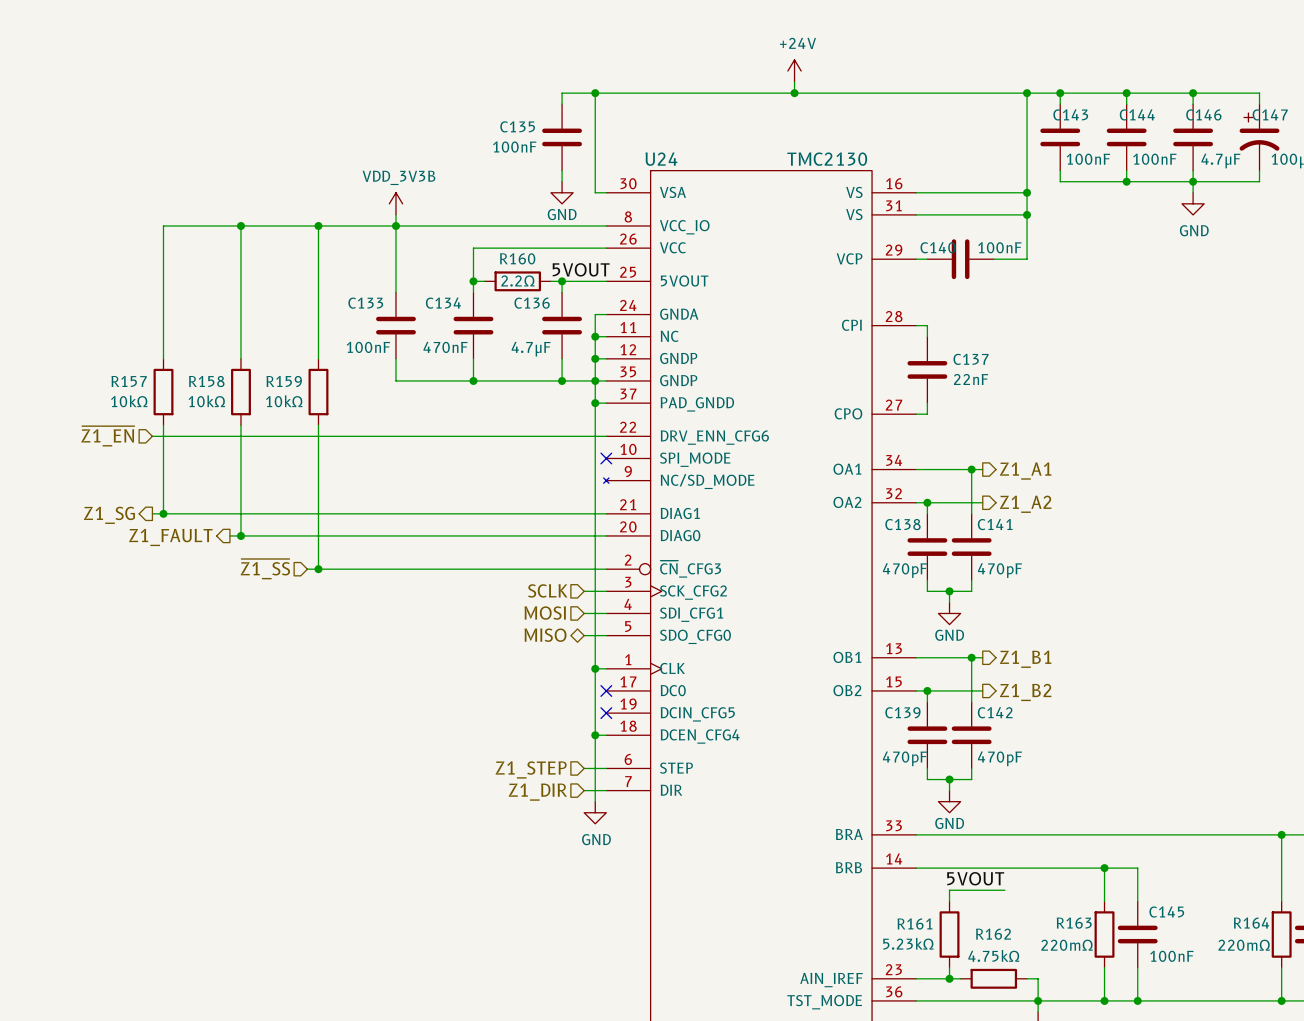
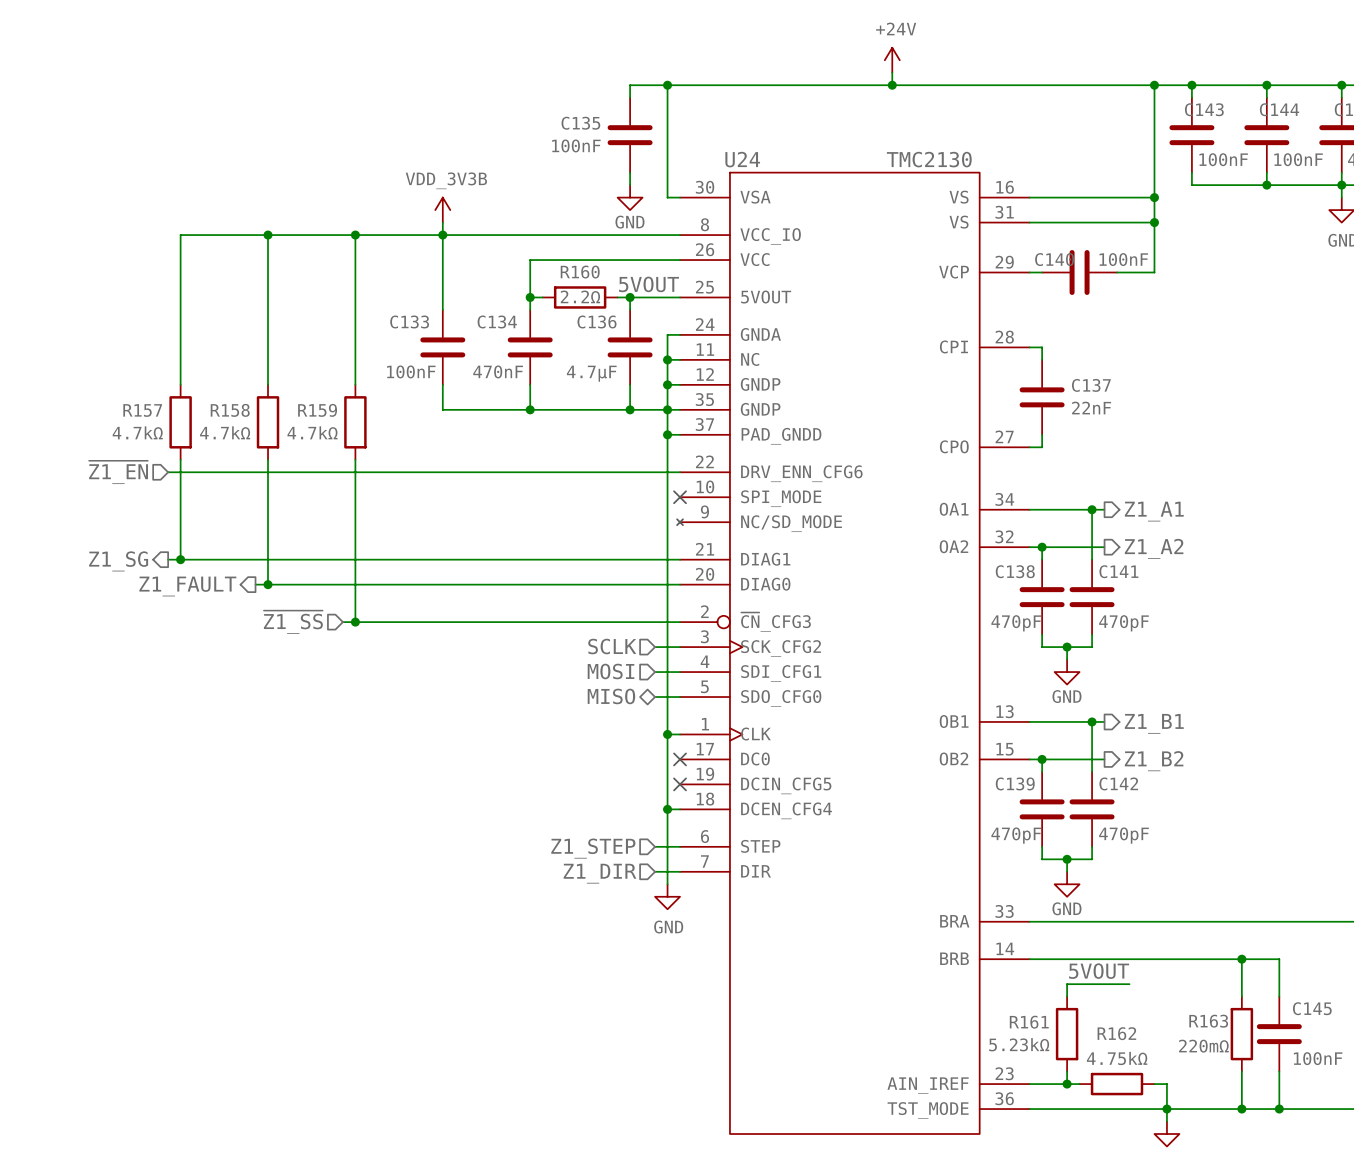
R157 value: 10kΩ (129, 401) -> 4.7kΩ (137, 432)
R158 value: 10kΩ (206, 401) -> 4.7kΩ (225, 432)
R159 value: 10kΩ (284, 401) -> 4.7kΩ (312, 432)

